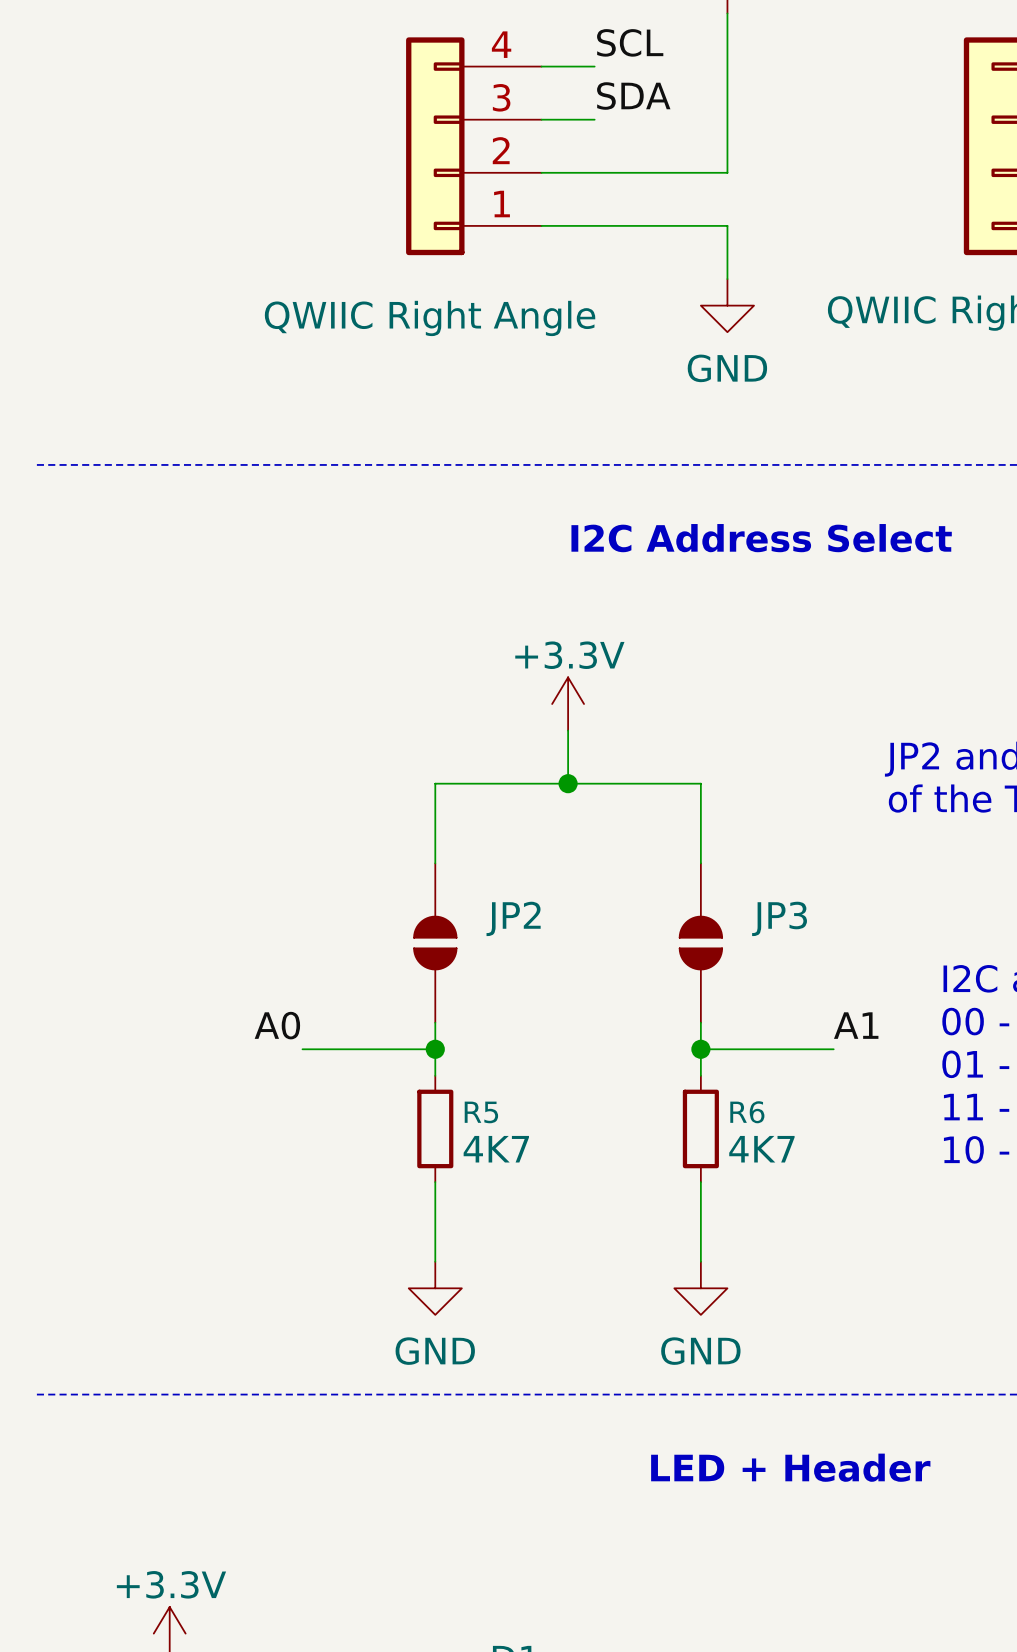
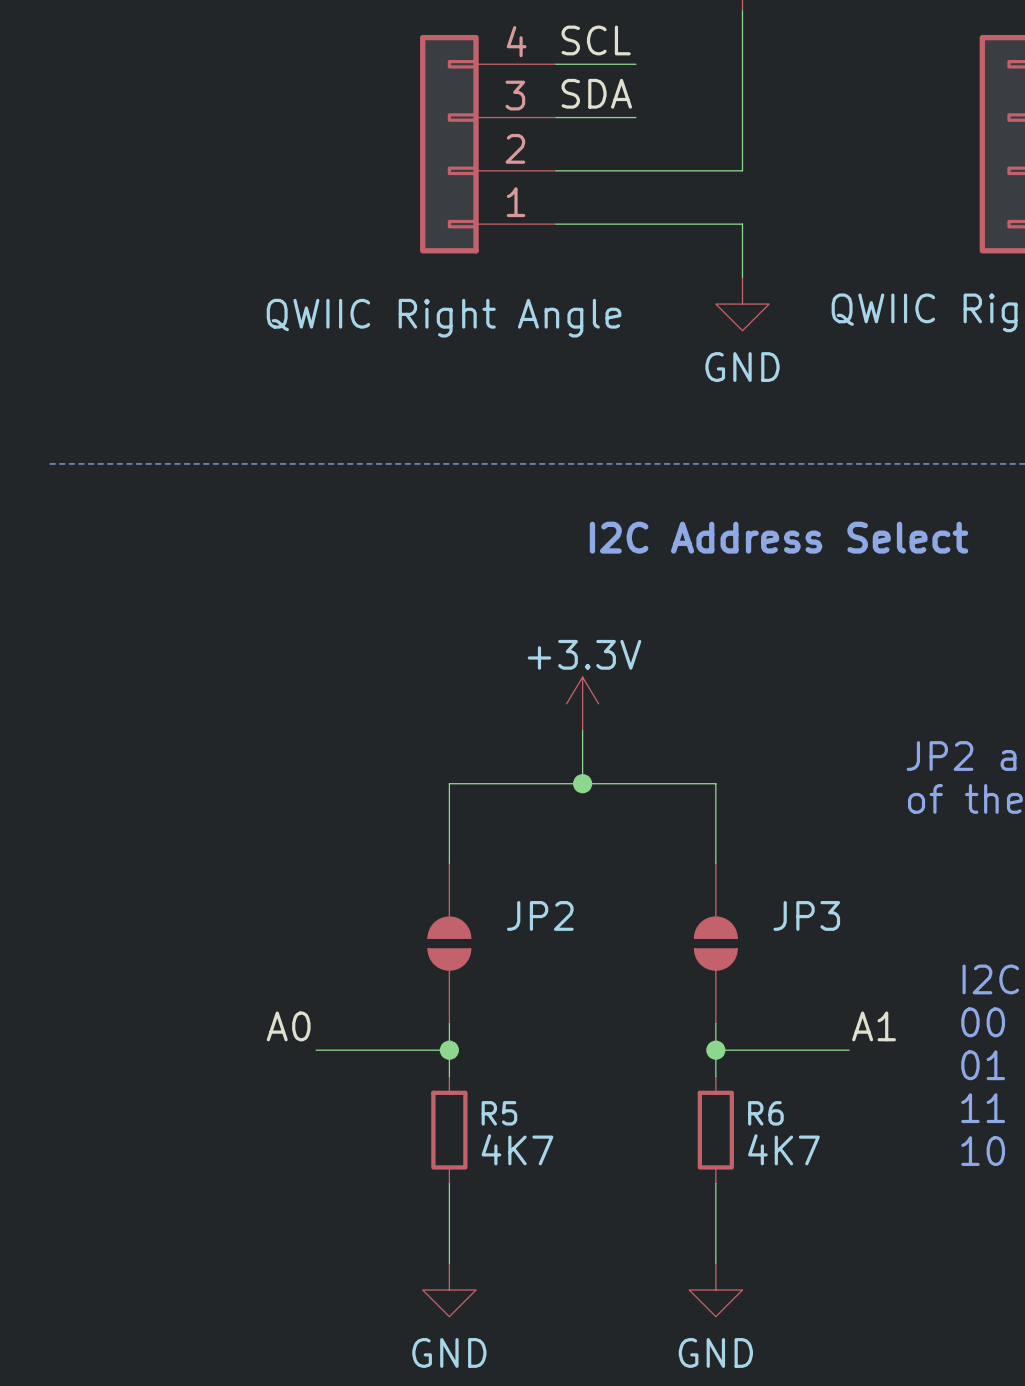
label position: SCL (630, 42) -> SCL (596, 40)
wire: none -> (609, 64) (635, 64)
label position: SDA (633, 96) -> SDA (596, 93)
wire: none -> (609, 117) (635, 117)

